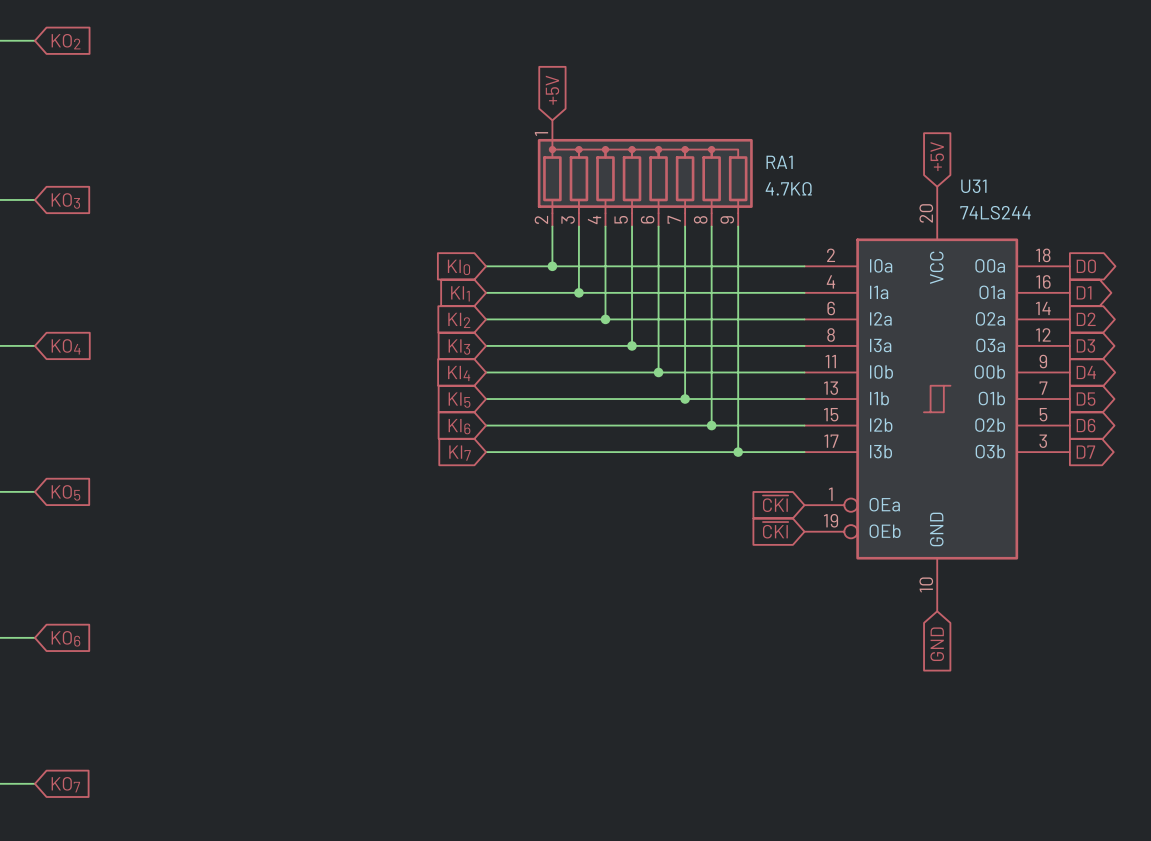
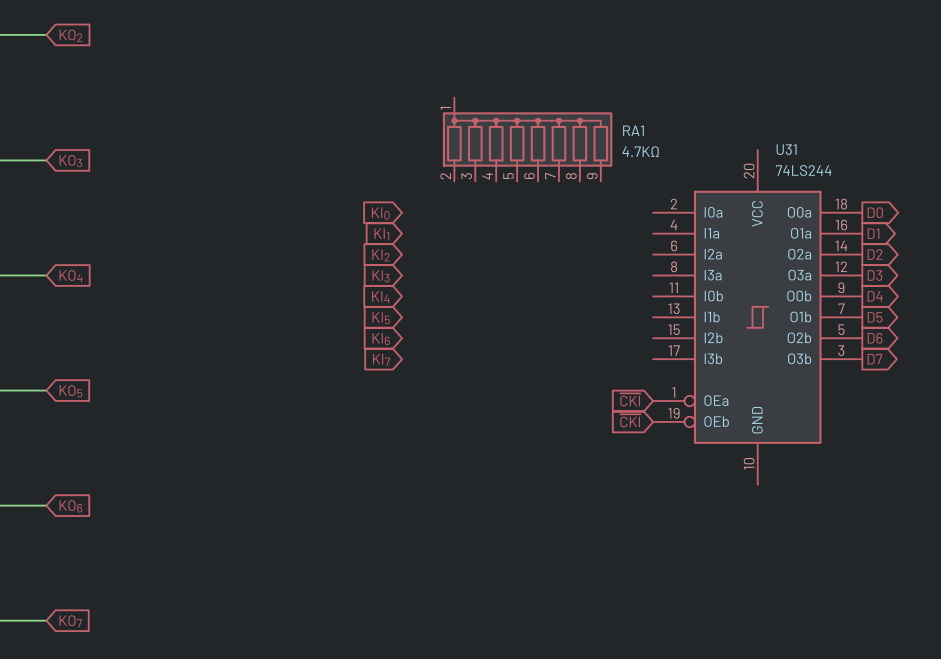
global label: +5V (552, 90) -> none
global label: +5V (937, 156) -> none
wire: (552, 226) (552, 266) -> none
wire: (578, 226) (578, 292) -> none
wire: (605, 226) (605, 319) -> none
wire: (632, 226) (632, 345) -> none
wire: (658, 226) (658, 372) -> none
wire: (685, 226) (685, 399) -> none
wire: (711, 226) (711, 425) -> none
wire: (738, 226) (738, 452) -> none
wire: (486, 266) (804, 266) -> none
junction: (552, 266) -> none
wire: (486, 292) (804, 292) -> none
junction: (578, 292) -> none
wire: (486, 319) (804, 319) -> none
junction: (605, 319) -> none
wire: (486, 345) (804, 345) -> none
junction: (632, 345) -> none
wire: (486, 372) (804, 372) -> none
junction: (658, 372) -> none
wire: (486, 399) (804, 399) -> none
junction: (685, 399) -> none
wire: (486, 425) (804, 425) -> none
junction: (711, 425) -> none
wire: (486, 452) (804, 452) -> none
junction: (738, 452) -> none
global label: GND (937, 644) -> none

